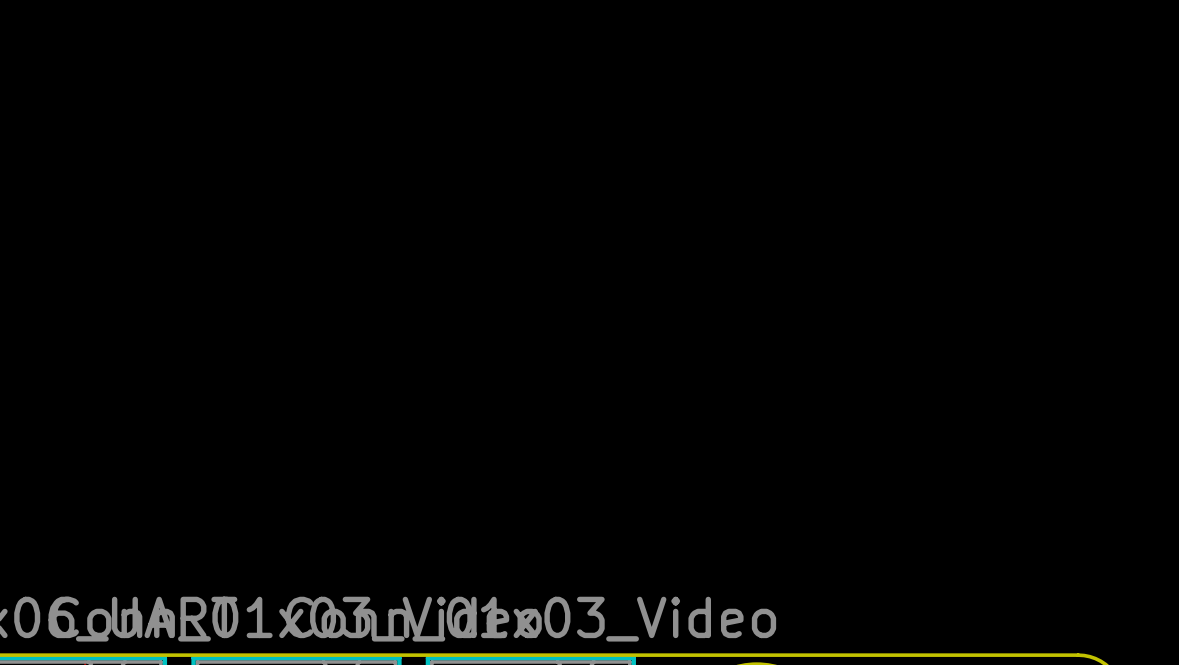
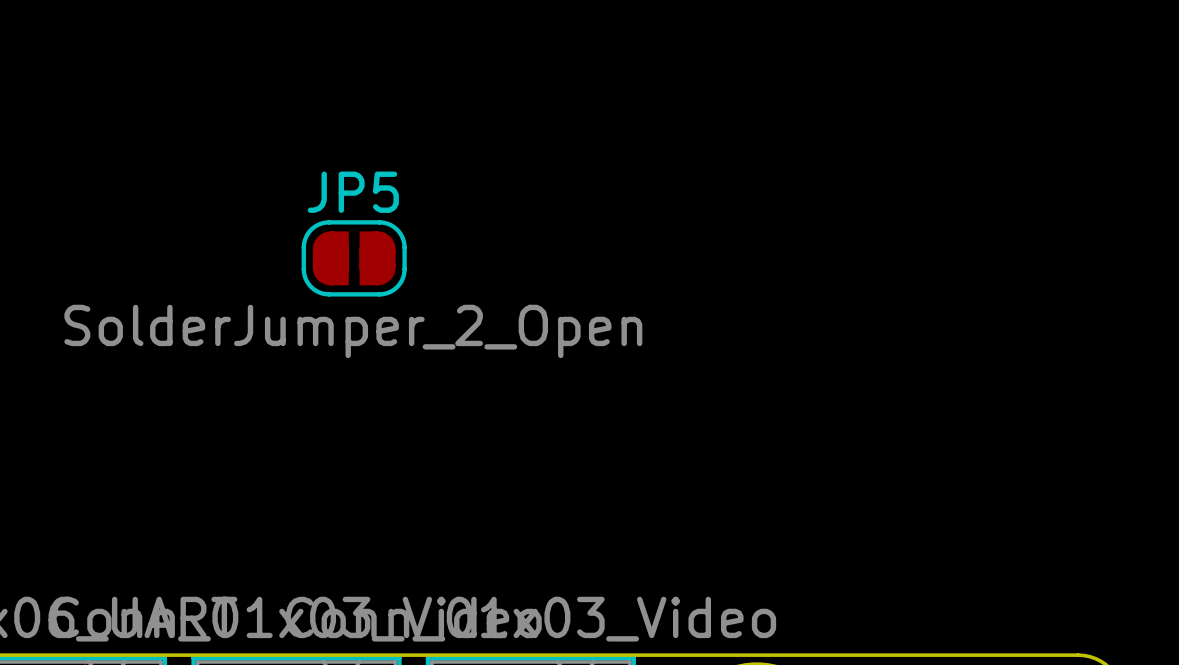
JP5: none -> SolderJumper_2_Open (354, 258)

